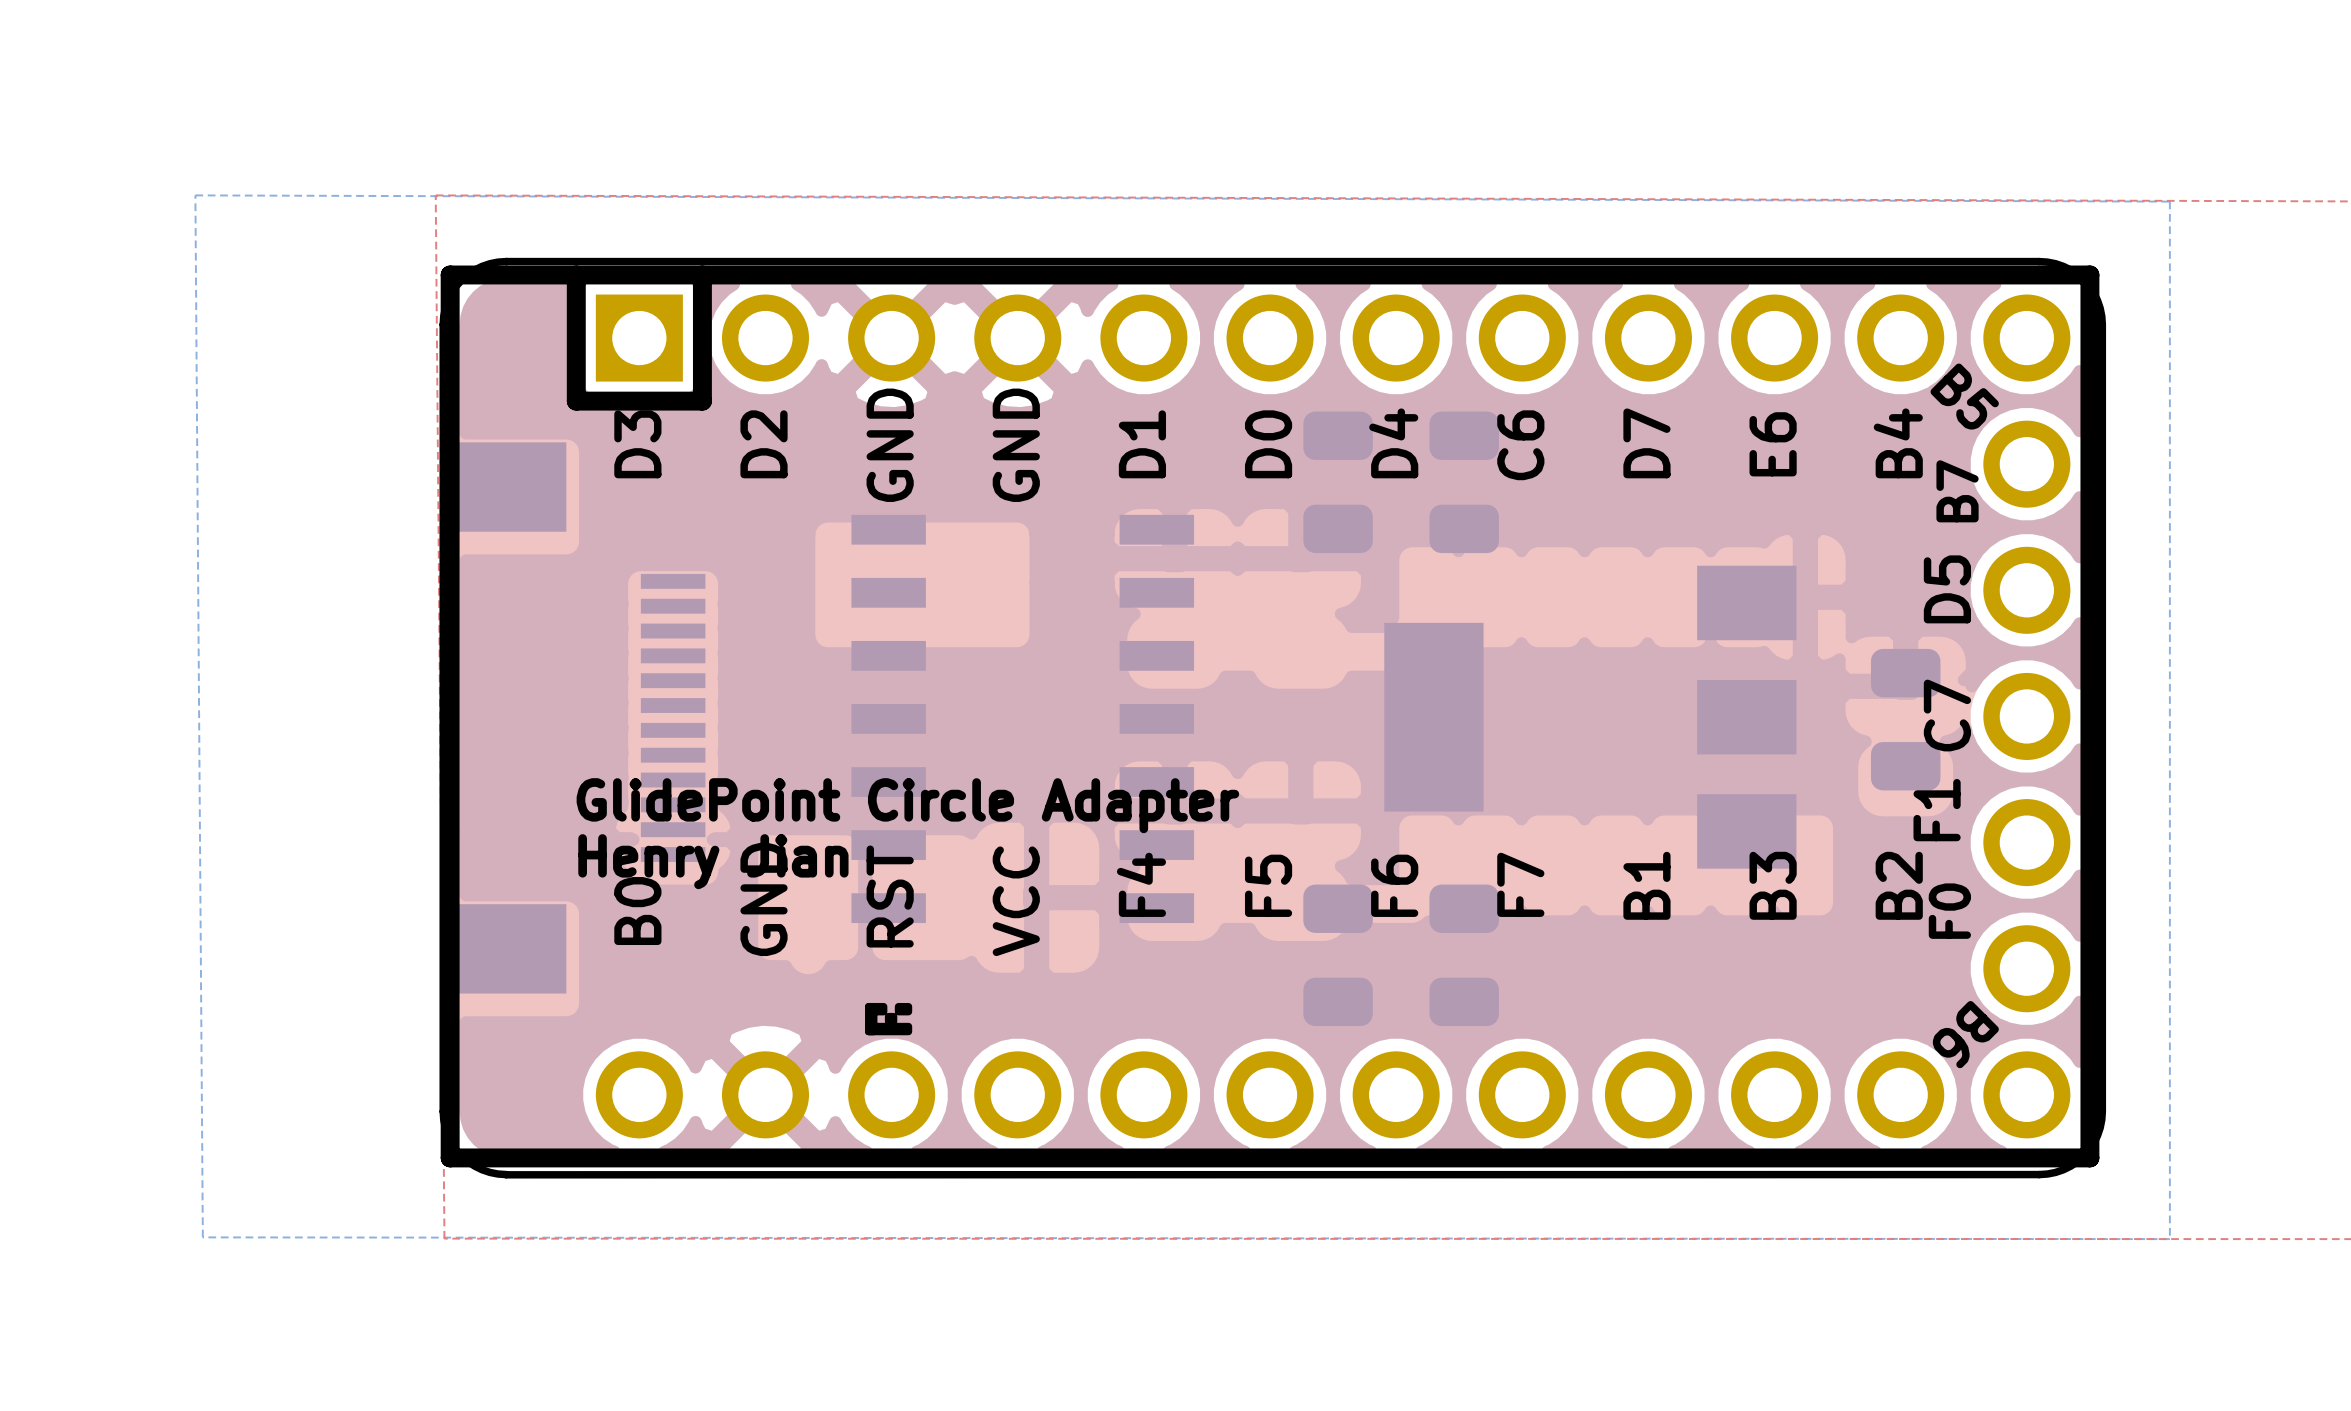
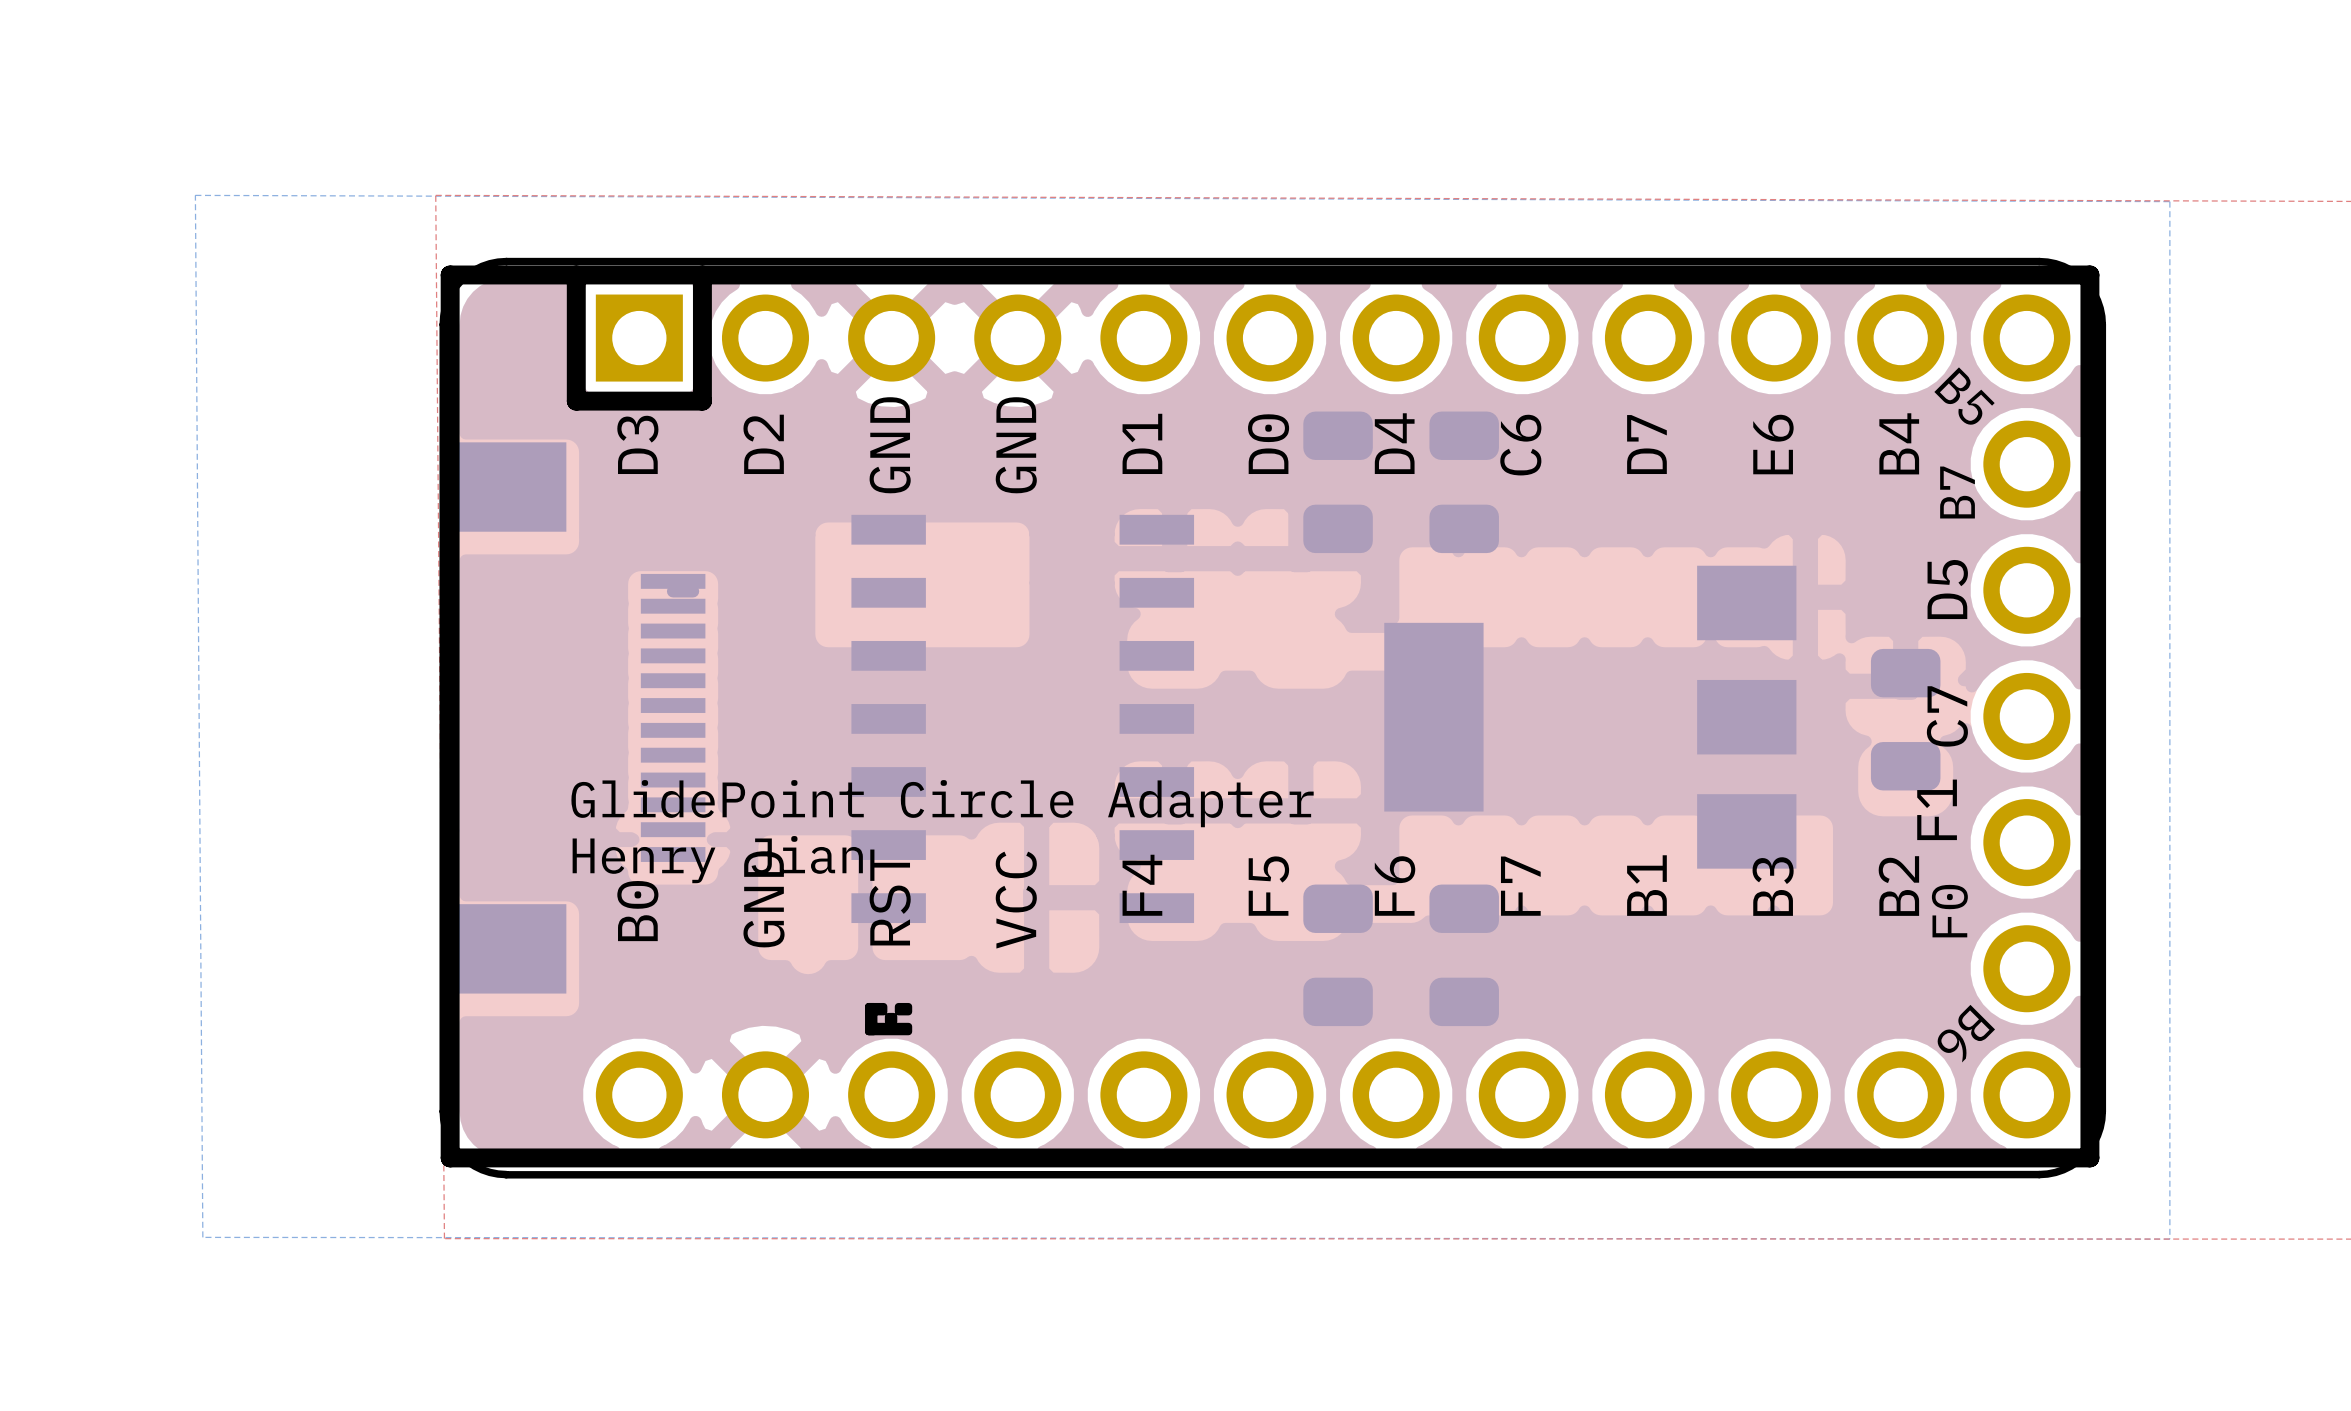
bottom track: none -> (673, 591) (692, 591)

